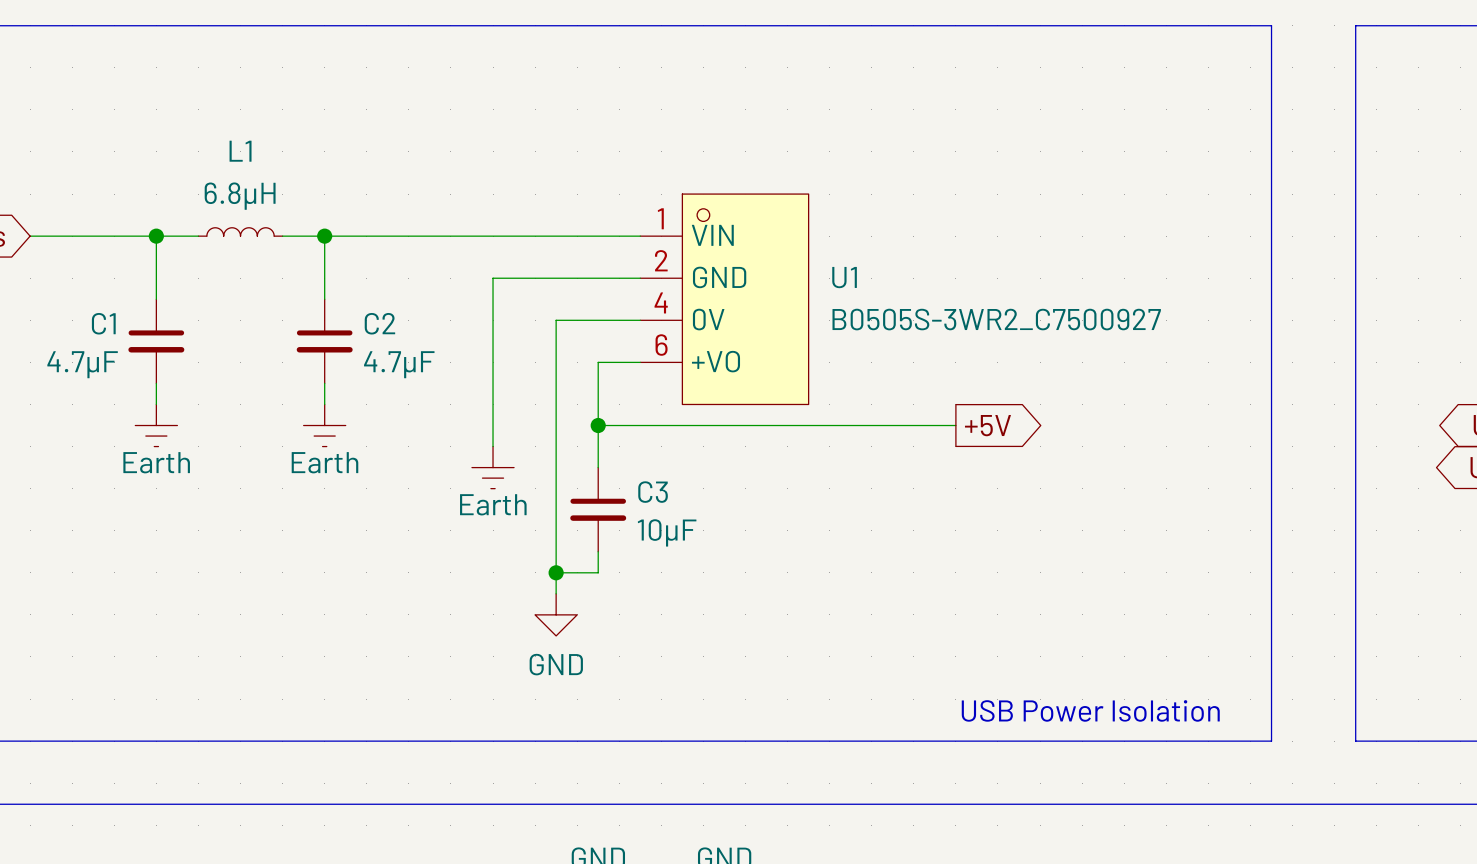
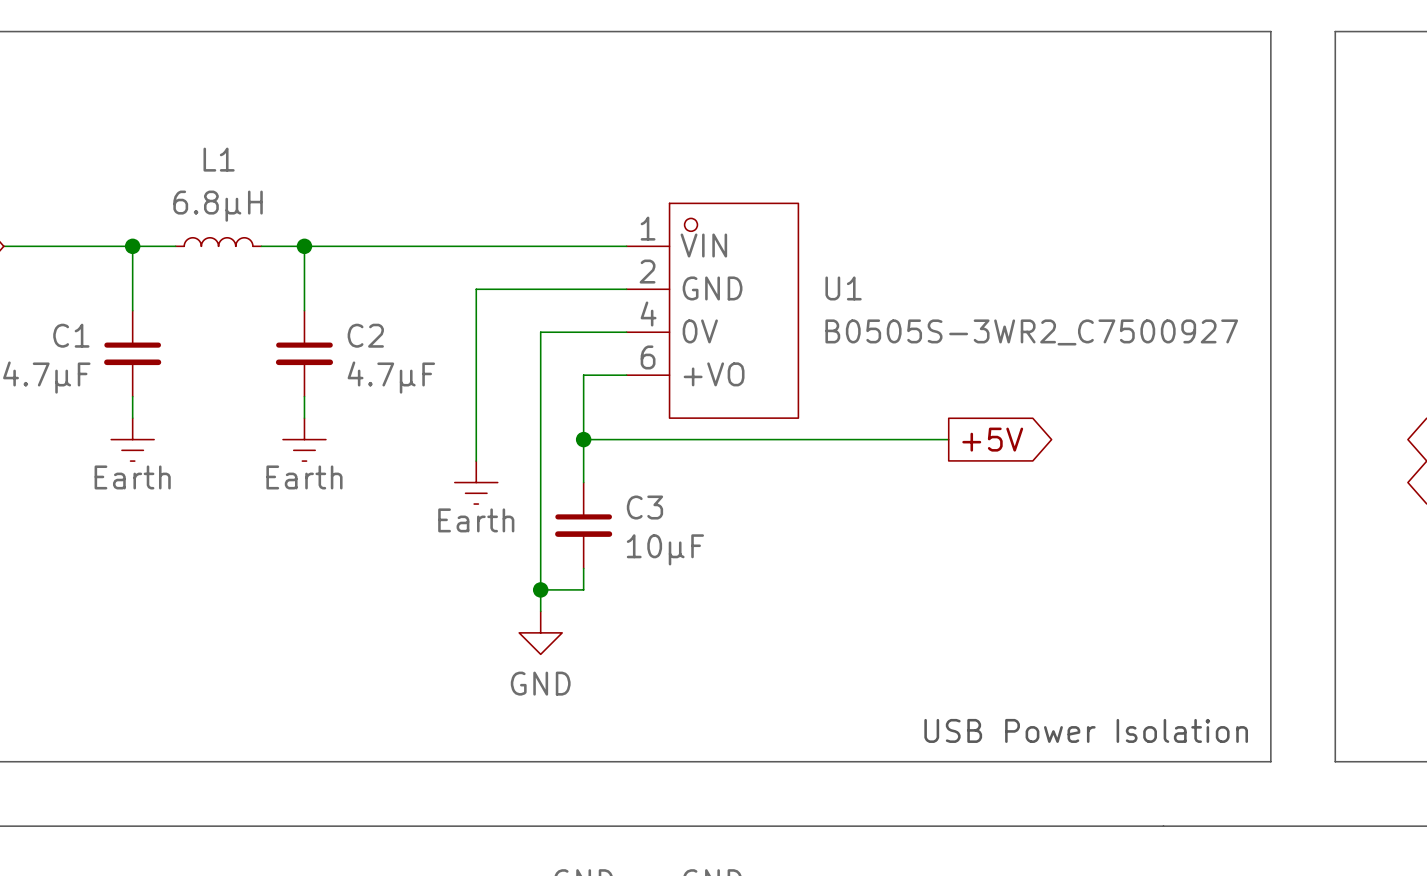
line: (1355, 25) (1355, 741) -> (1356, 31) (1335, 31) (1335, 761) (1356, 761)

